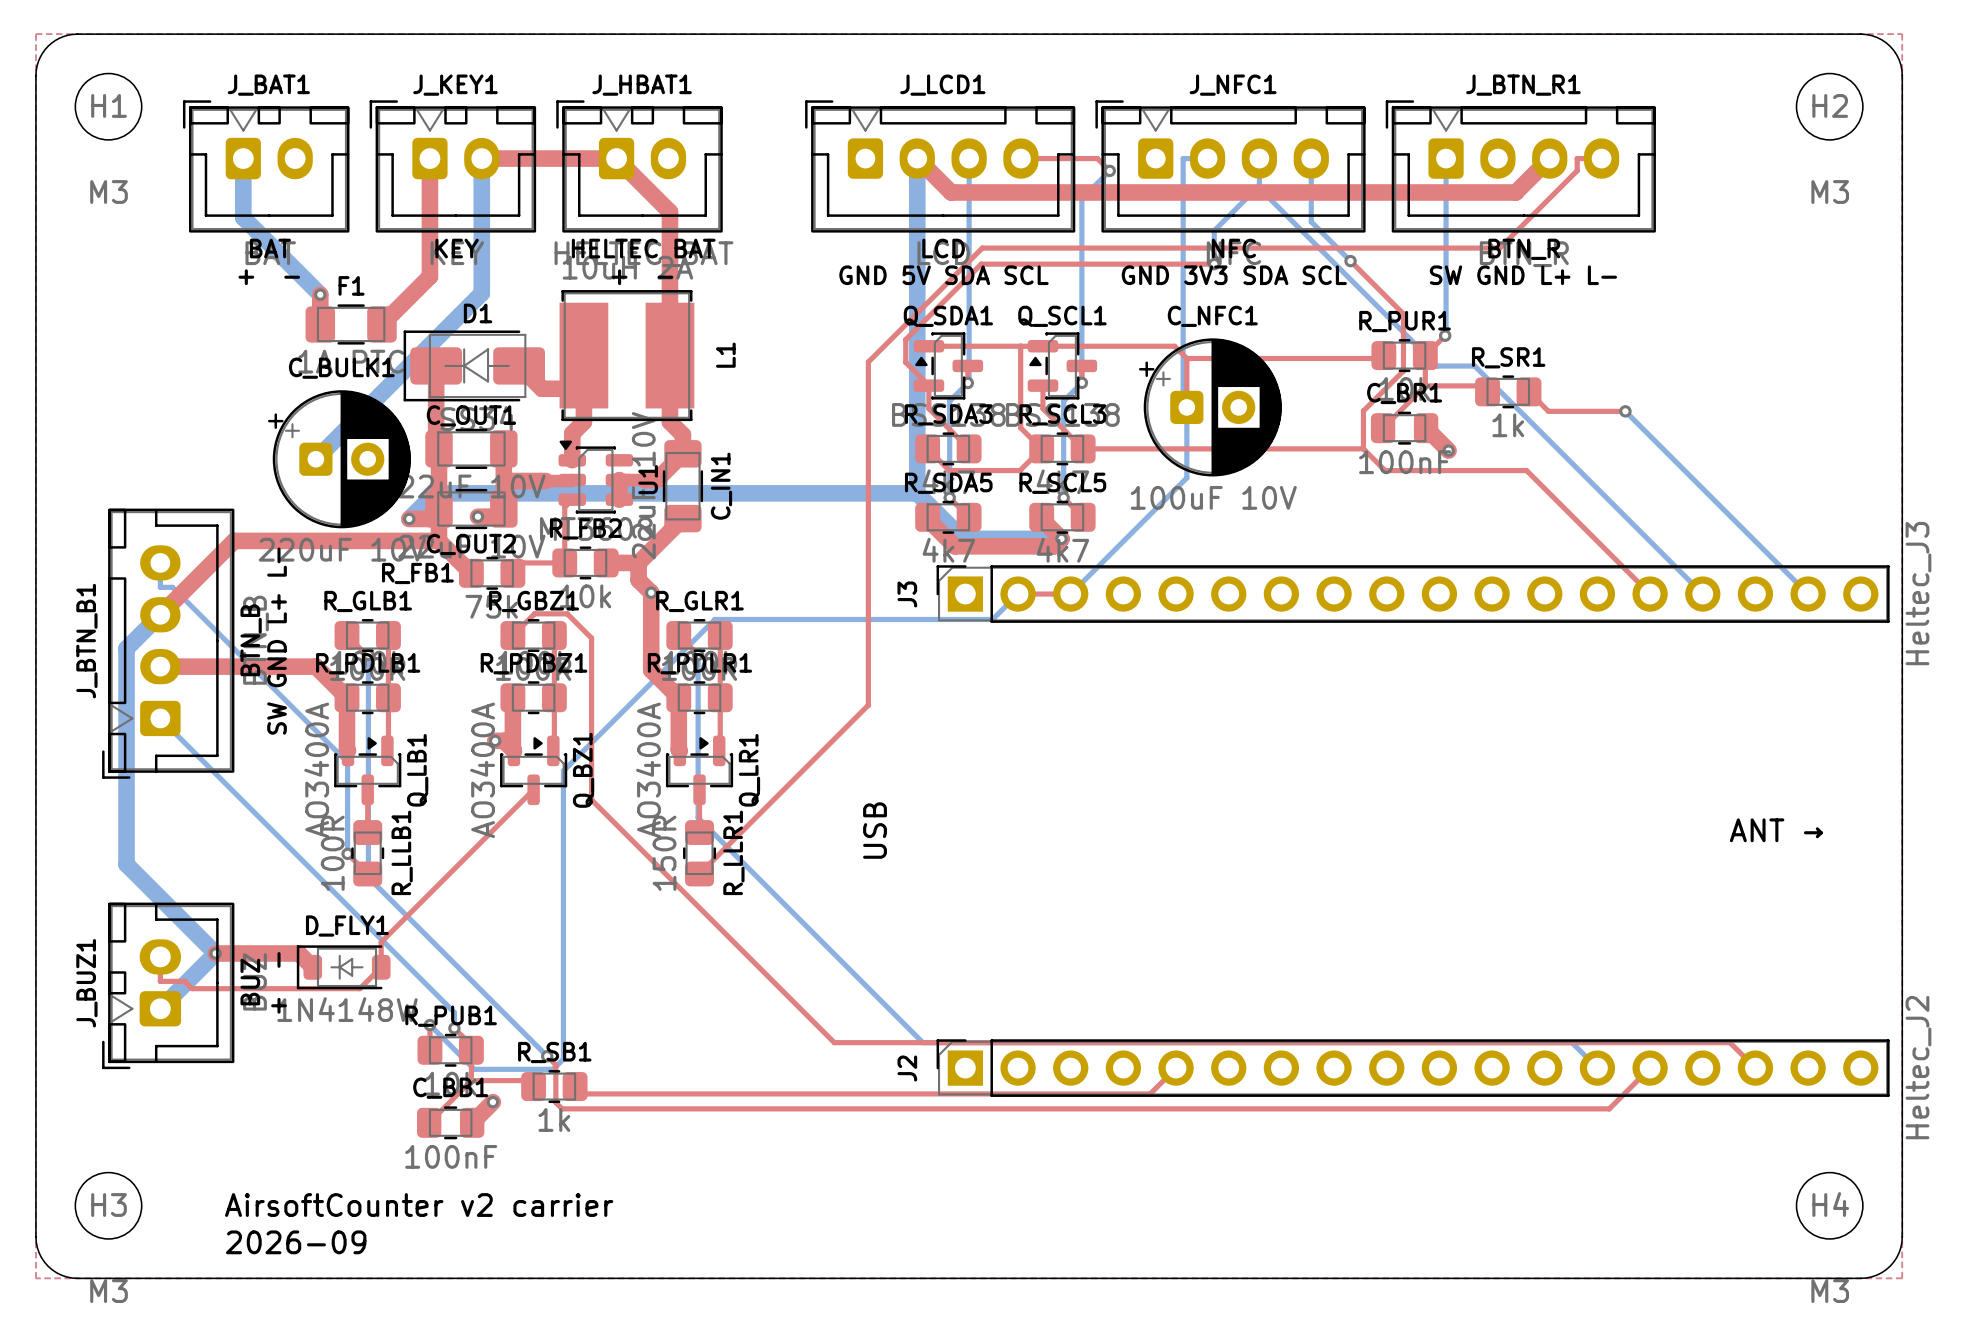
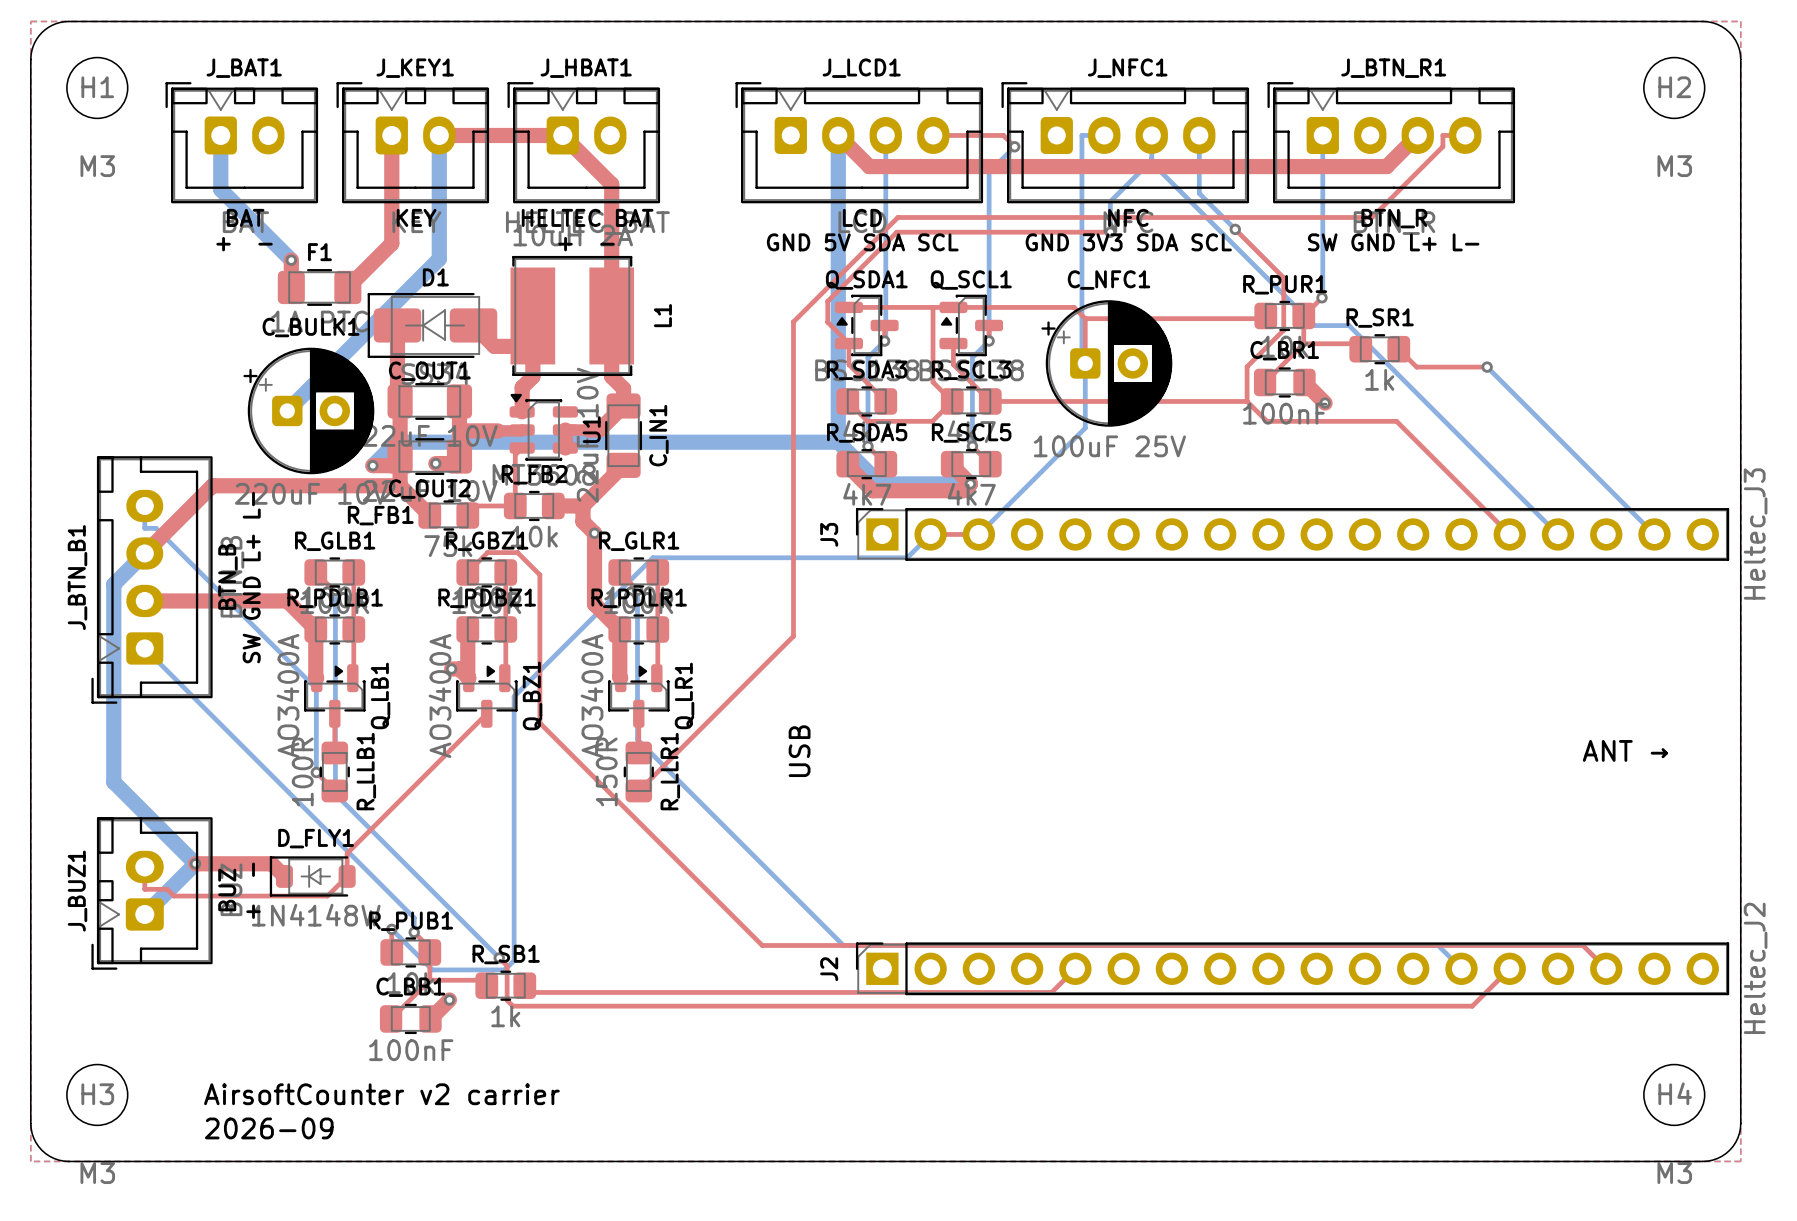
C_NFC1 value: 100uF 10V (1213, 497) -> 100uF 25V (1109, 446)

